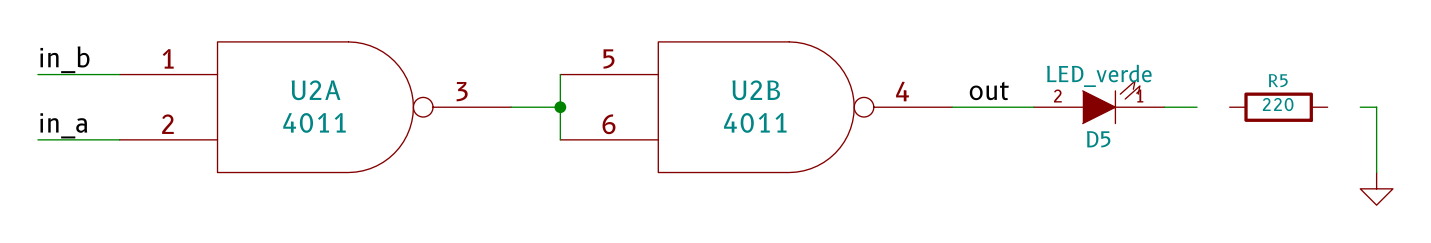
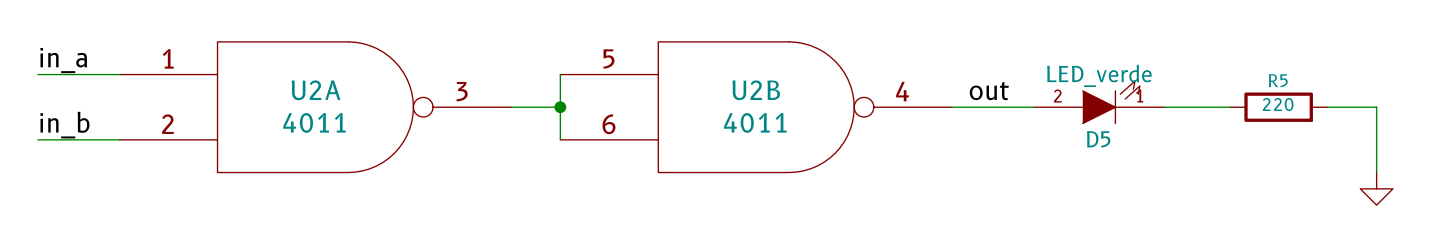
label: in_b (64, 59) -> in_a (63, 60)
wire: none -> (1197, 107) (1229, 107)
wire: none -> (1327, 107) (1360, 107)
label: in_a (63, 125) -> in_b (64, 125)

